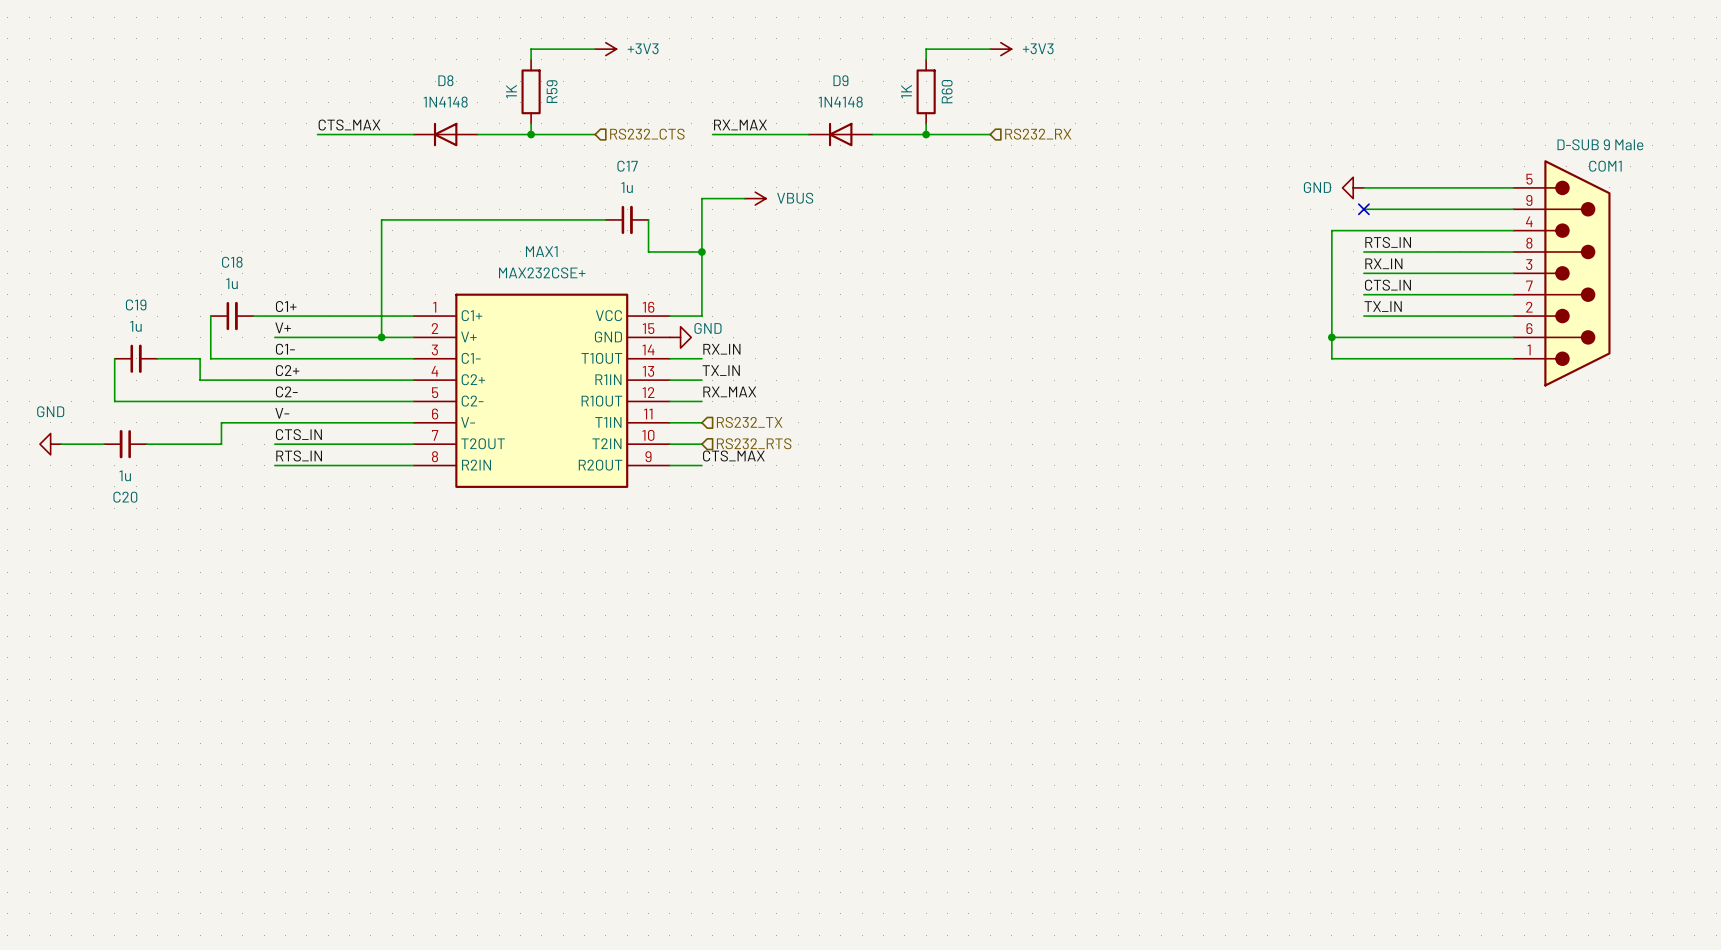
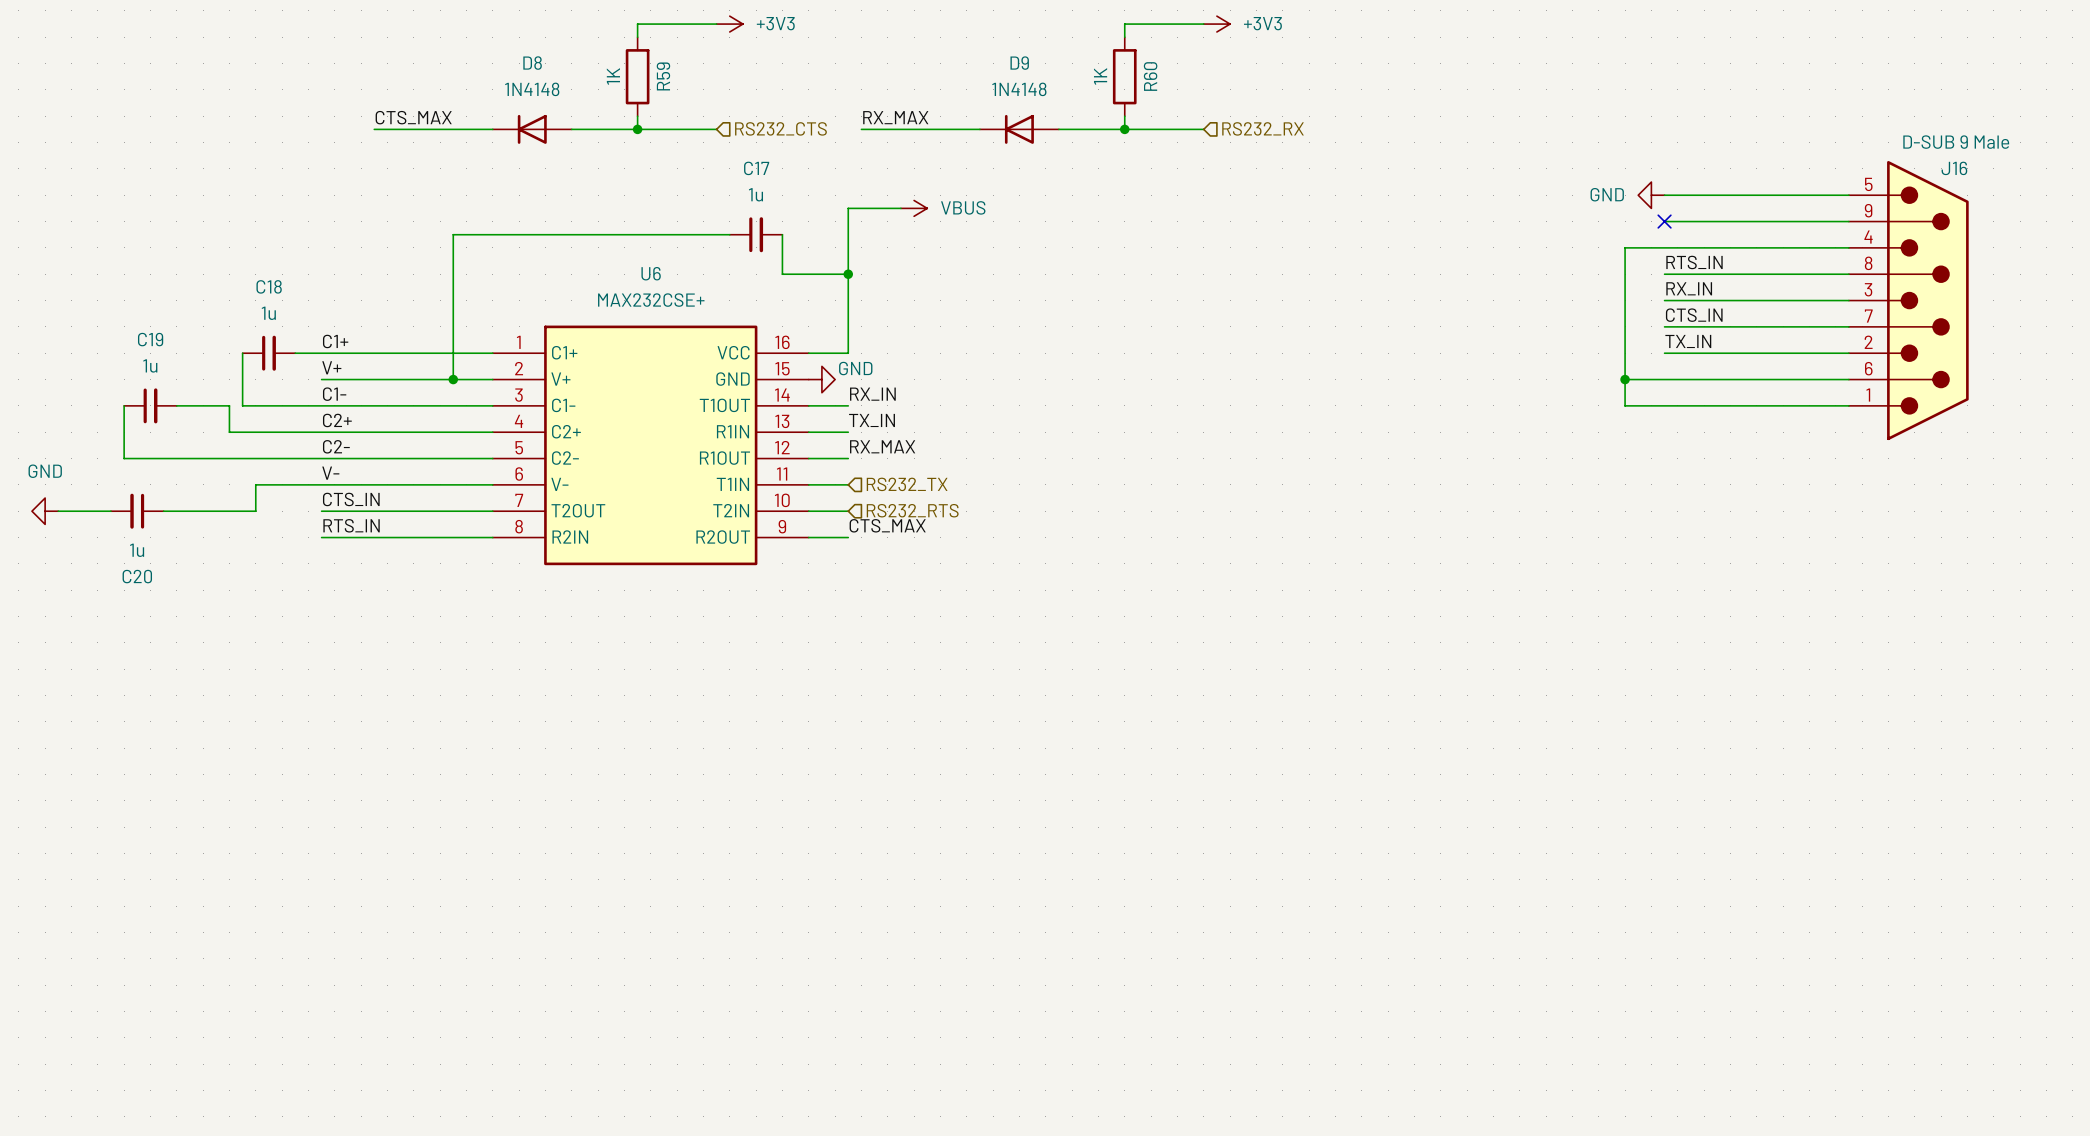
COM1 name: COM1 (1605, 166) -> J16 (1954, 168)
MAX1 name: MAX1 (541, 251) -> U6 (651, 273)

